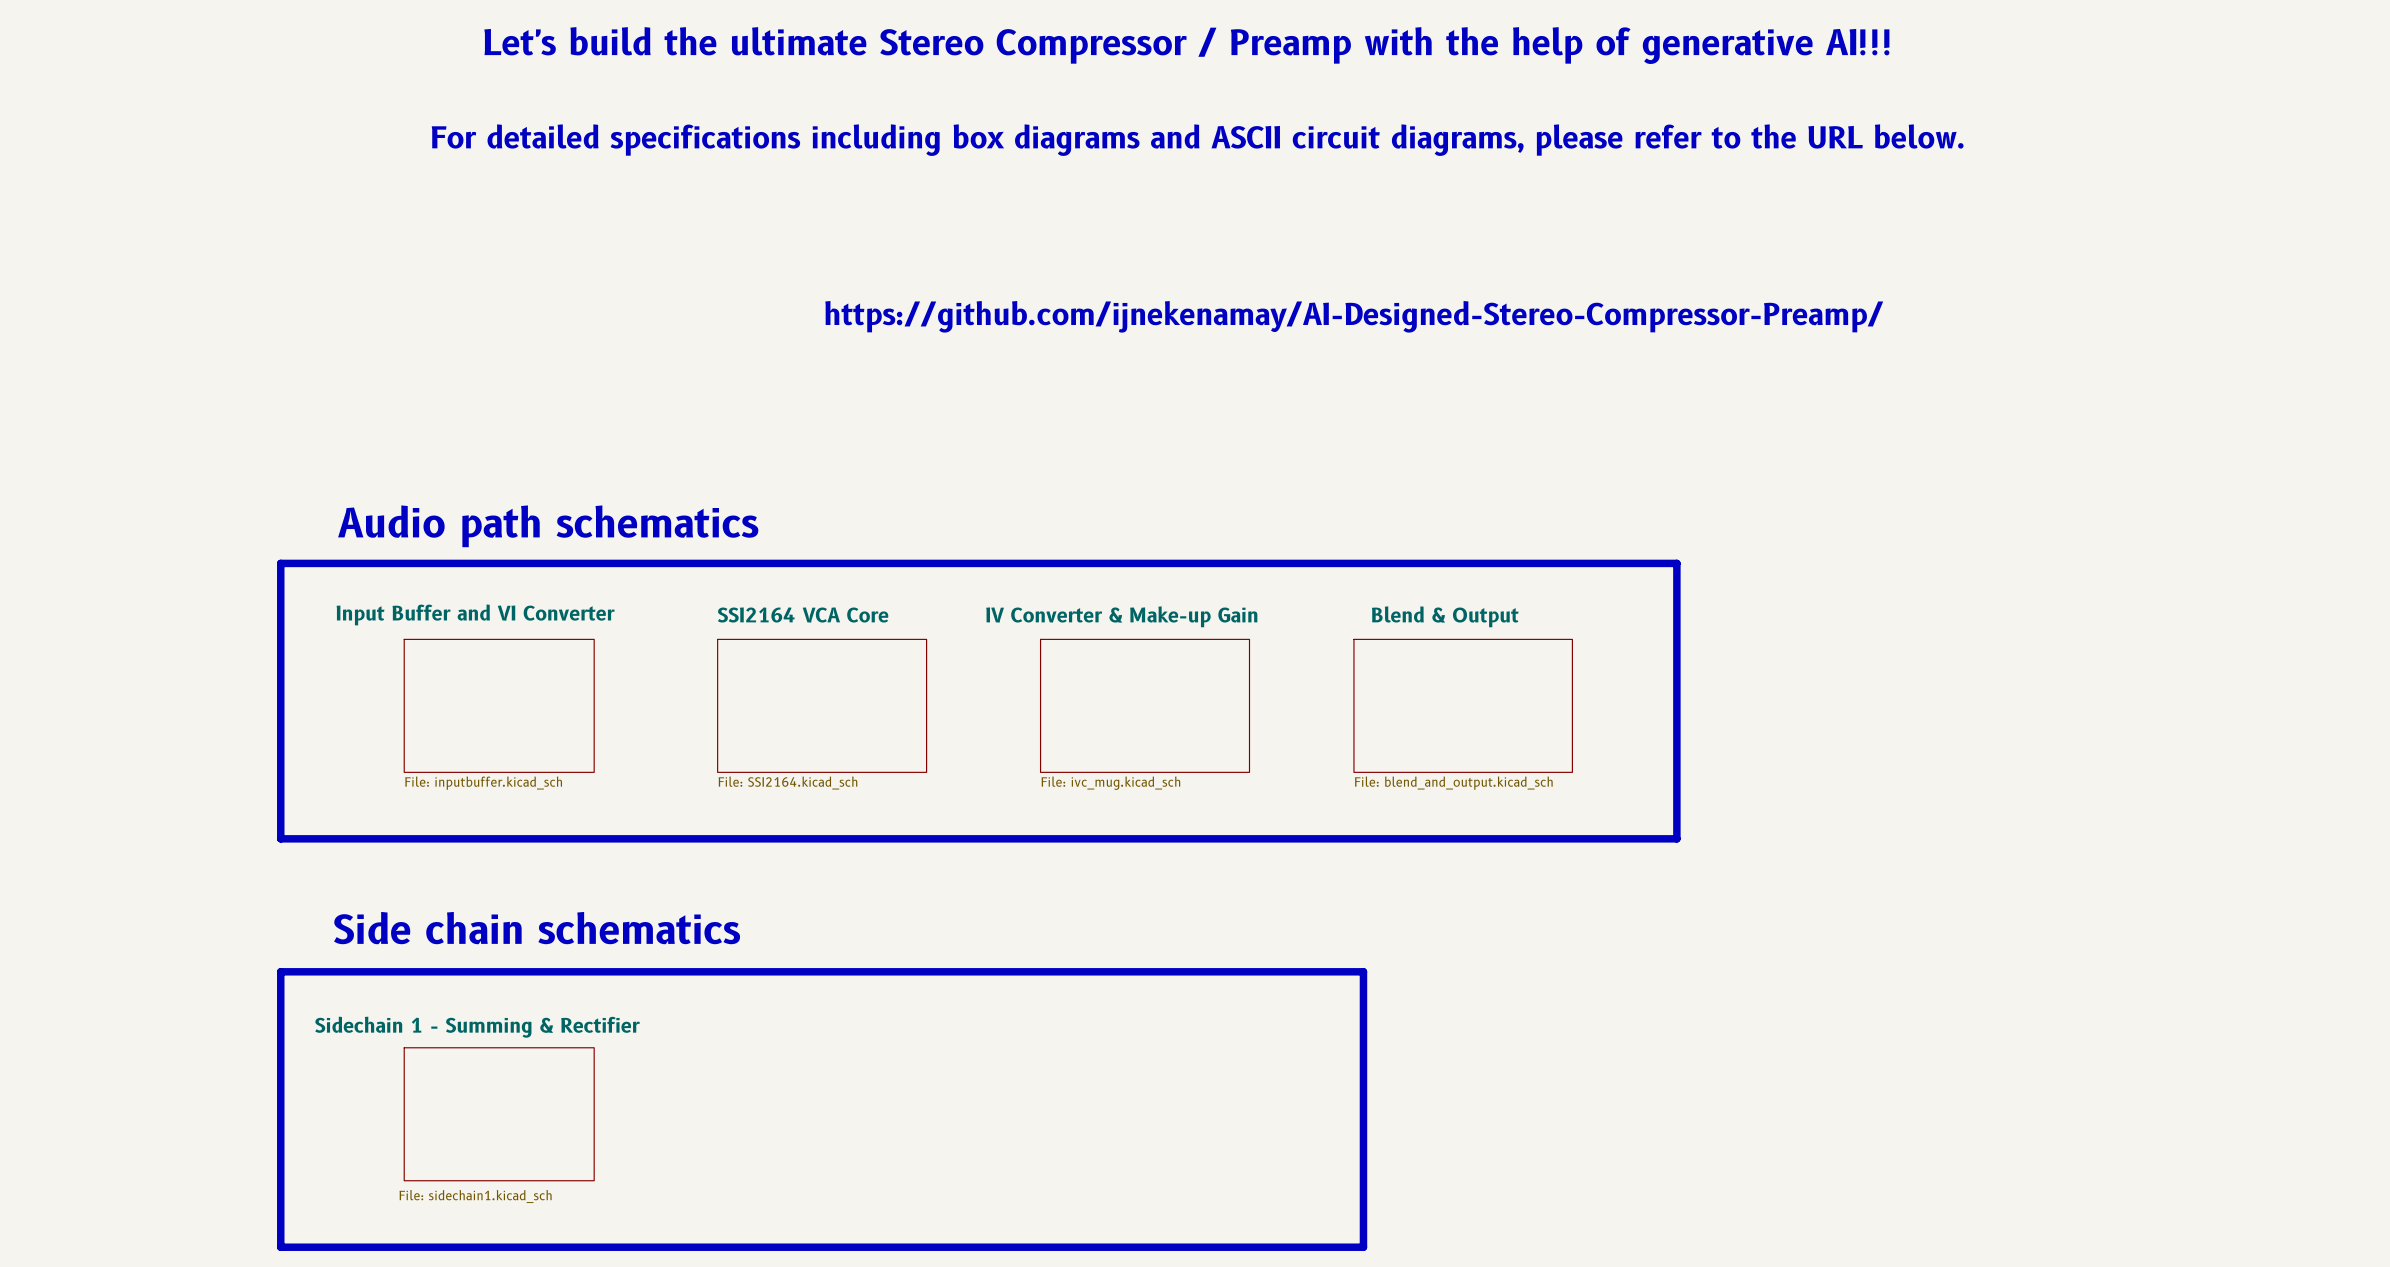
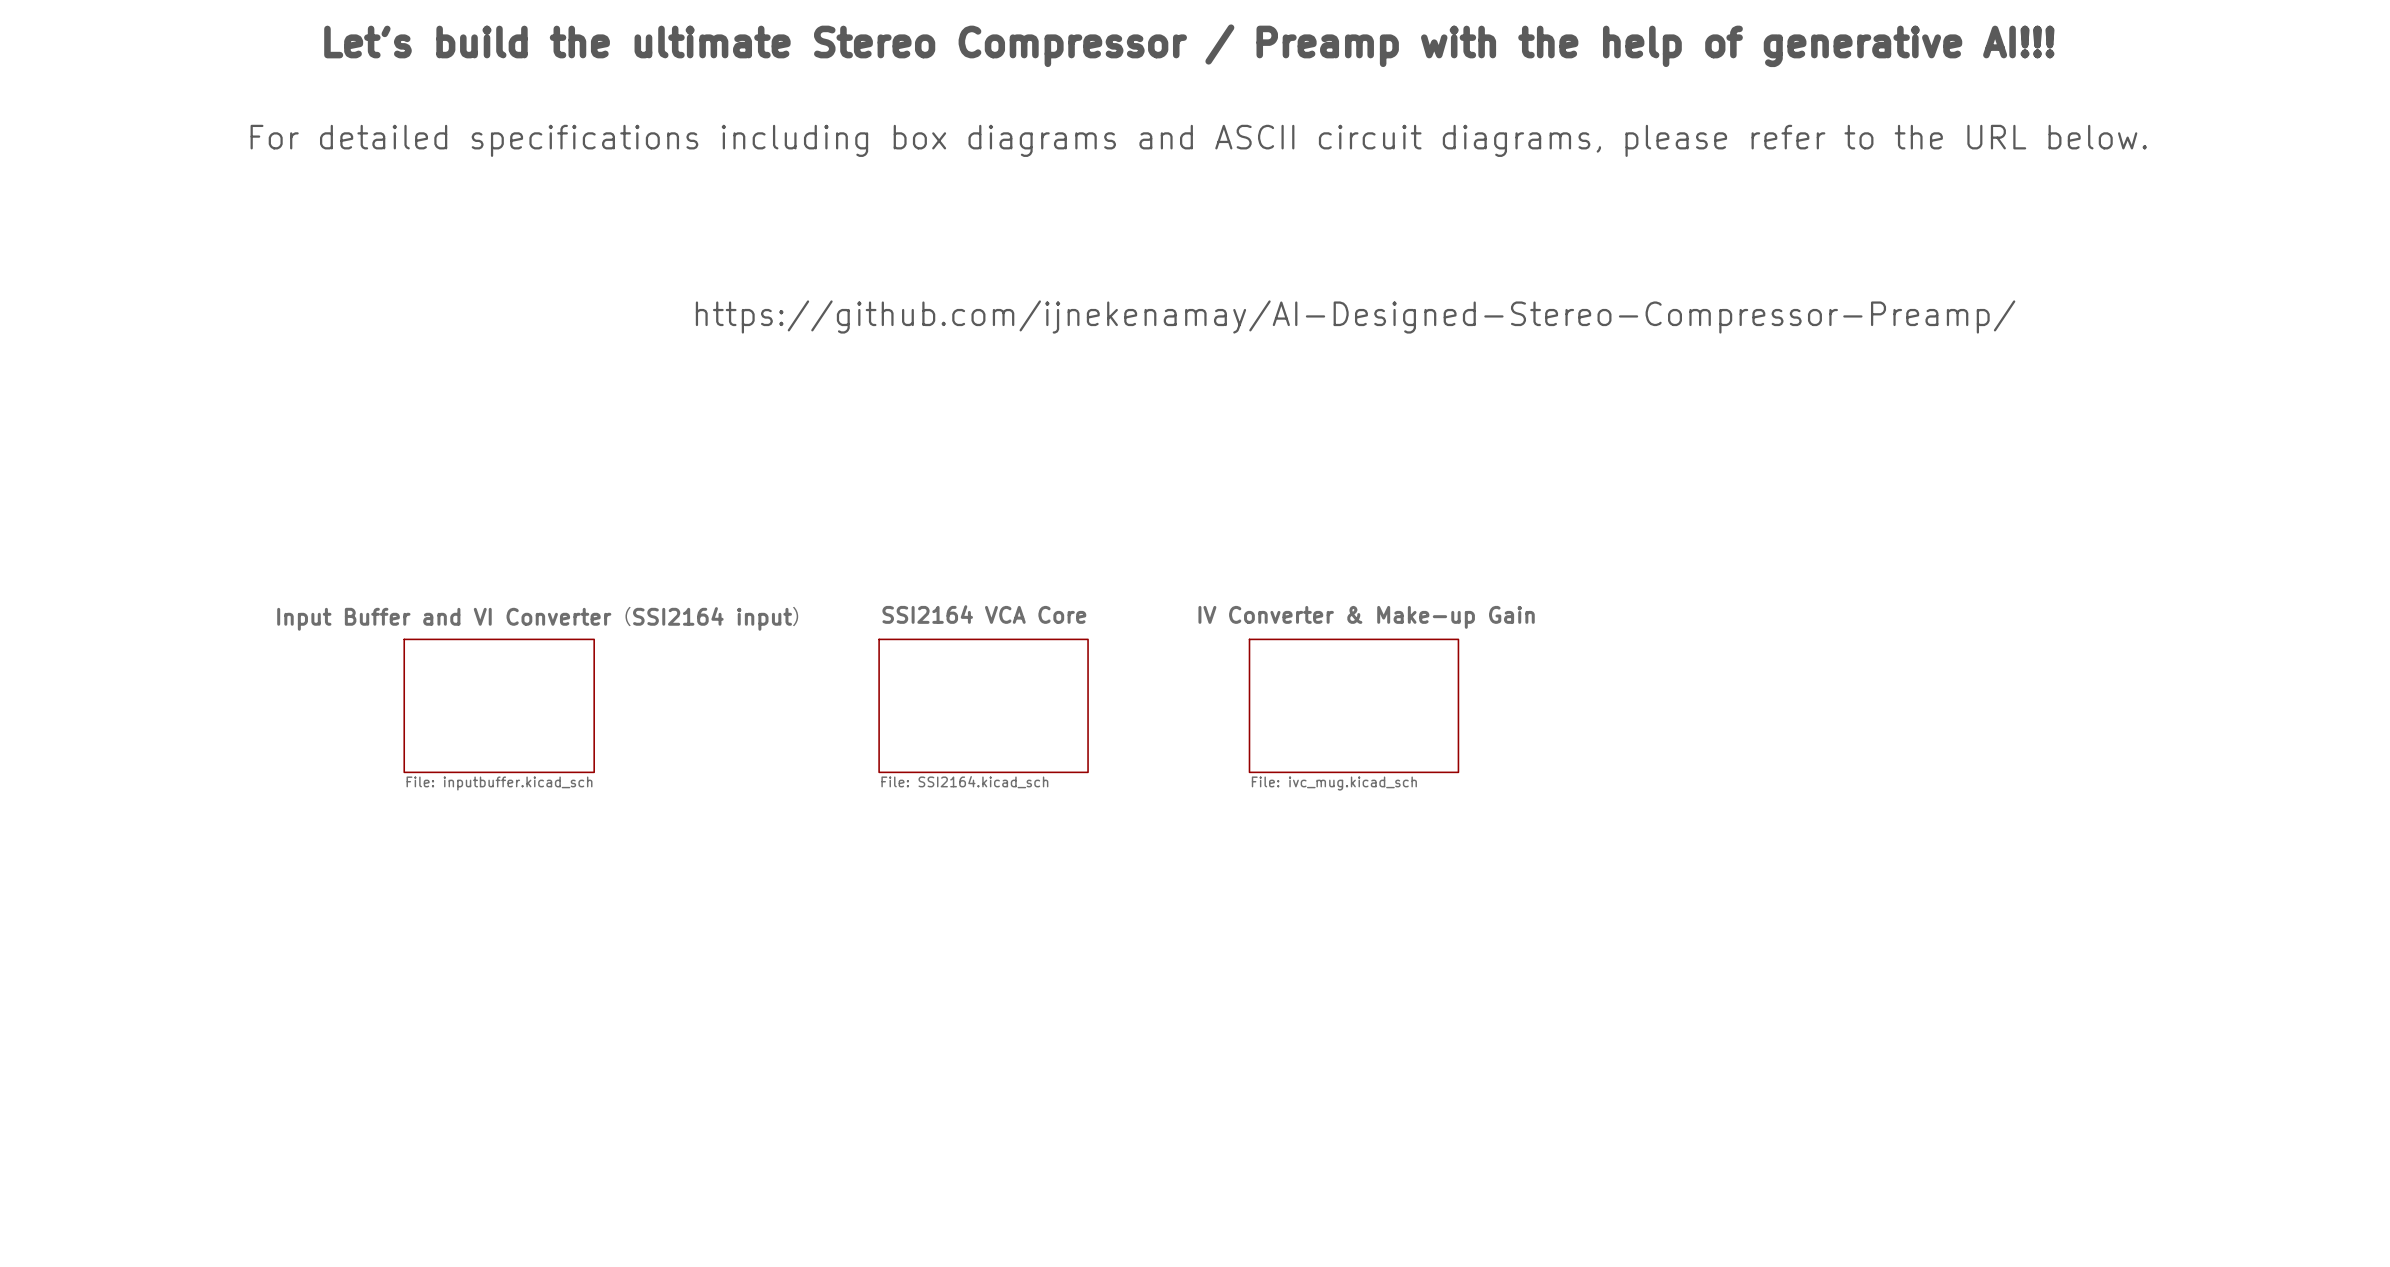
text: Audio path schematics (548, 526) -> none
line: (280, 563) (1676, 563) (1676, 838) (280, 838) (280, 563) -> none
sheet Input Buffer and VI Converter name: Input Buffer and VI Converter (475, 614) -> Input Buffer and VI Converter（SSI2164 input） (538, 618)
sheet SSI2164 VCA Core position: (822, 705) -> (983, 705)
sheet IV Converter & Make-up Gain: File: ivc_mug.kicad_sch (1145, 705) -> none
sheet IV Converter & Make-up Gain: none -> File: ivc_mug.kicad_sch (1353, 705)
sheet Blend & Output: File: blend_and_output.kicad_sch (1463, 705) -> none
text: Side chain schematics (537, 928) -> none
line: (280, 971) (280, 1247) (1363, 1247) (1363, 971) (280, 971) -> none
sheet Sidechain 1 - Summing & Rectifier: File: sidechain1.kicad_sch (499, 1114) -> none

